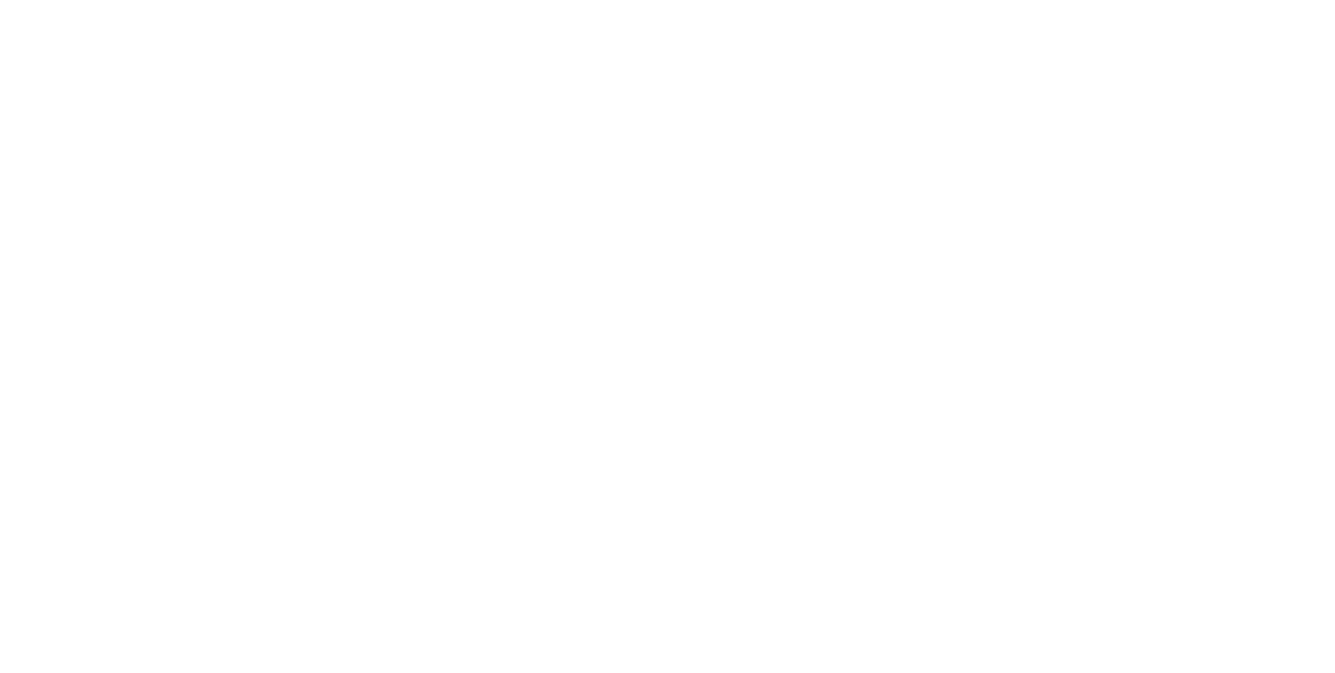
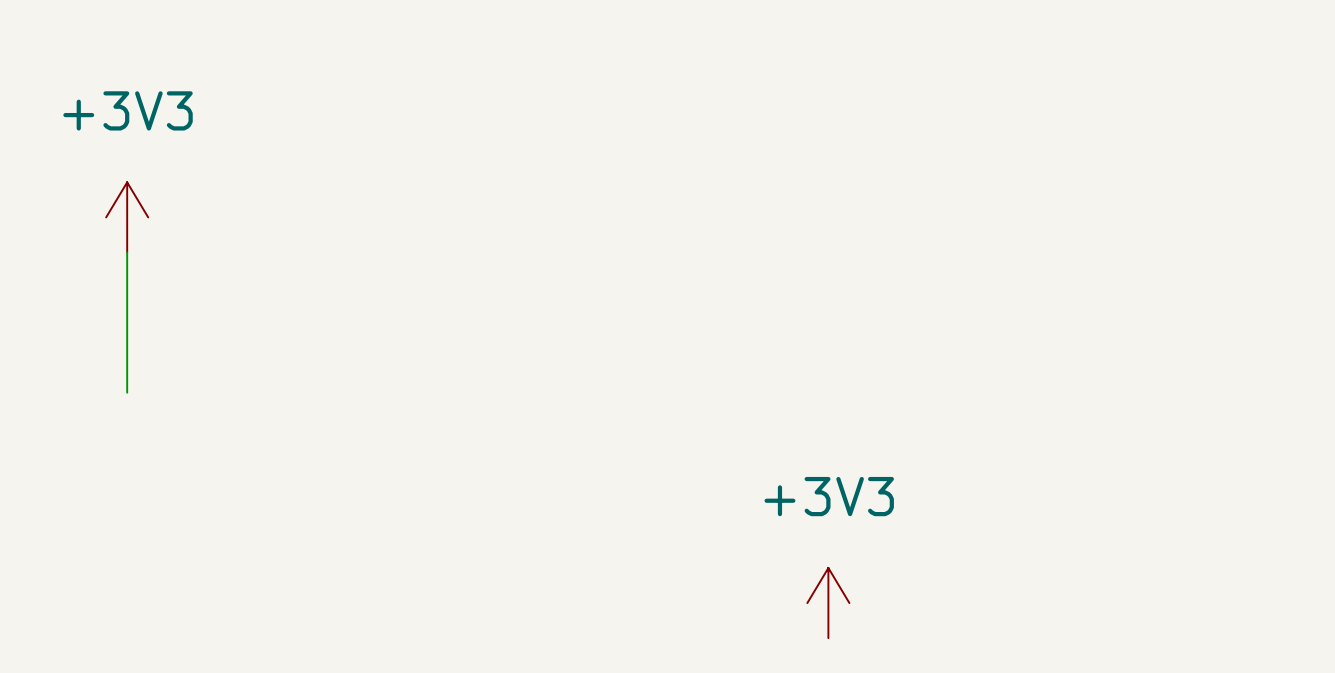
power symbol: none -> +3V3 (127, 217)
wire: none -> (127, 252) (127, 392)
power symbol: none -> +3V3 (828, 603)

